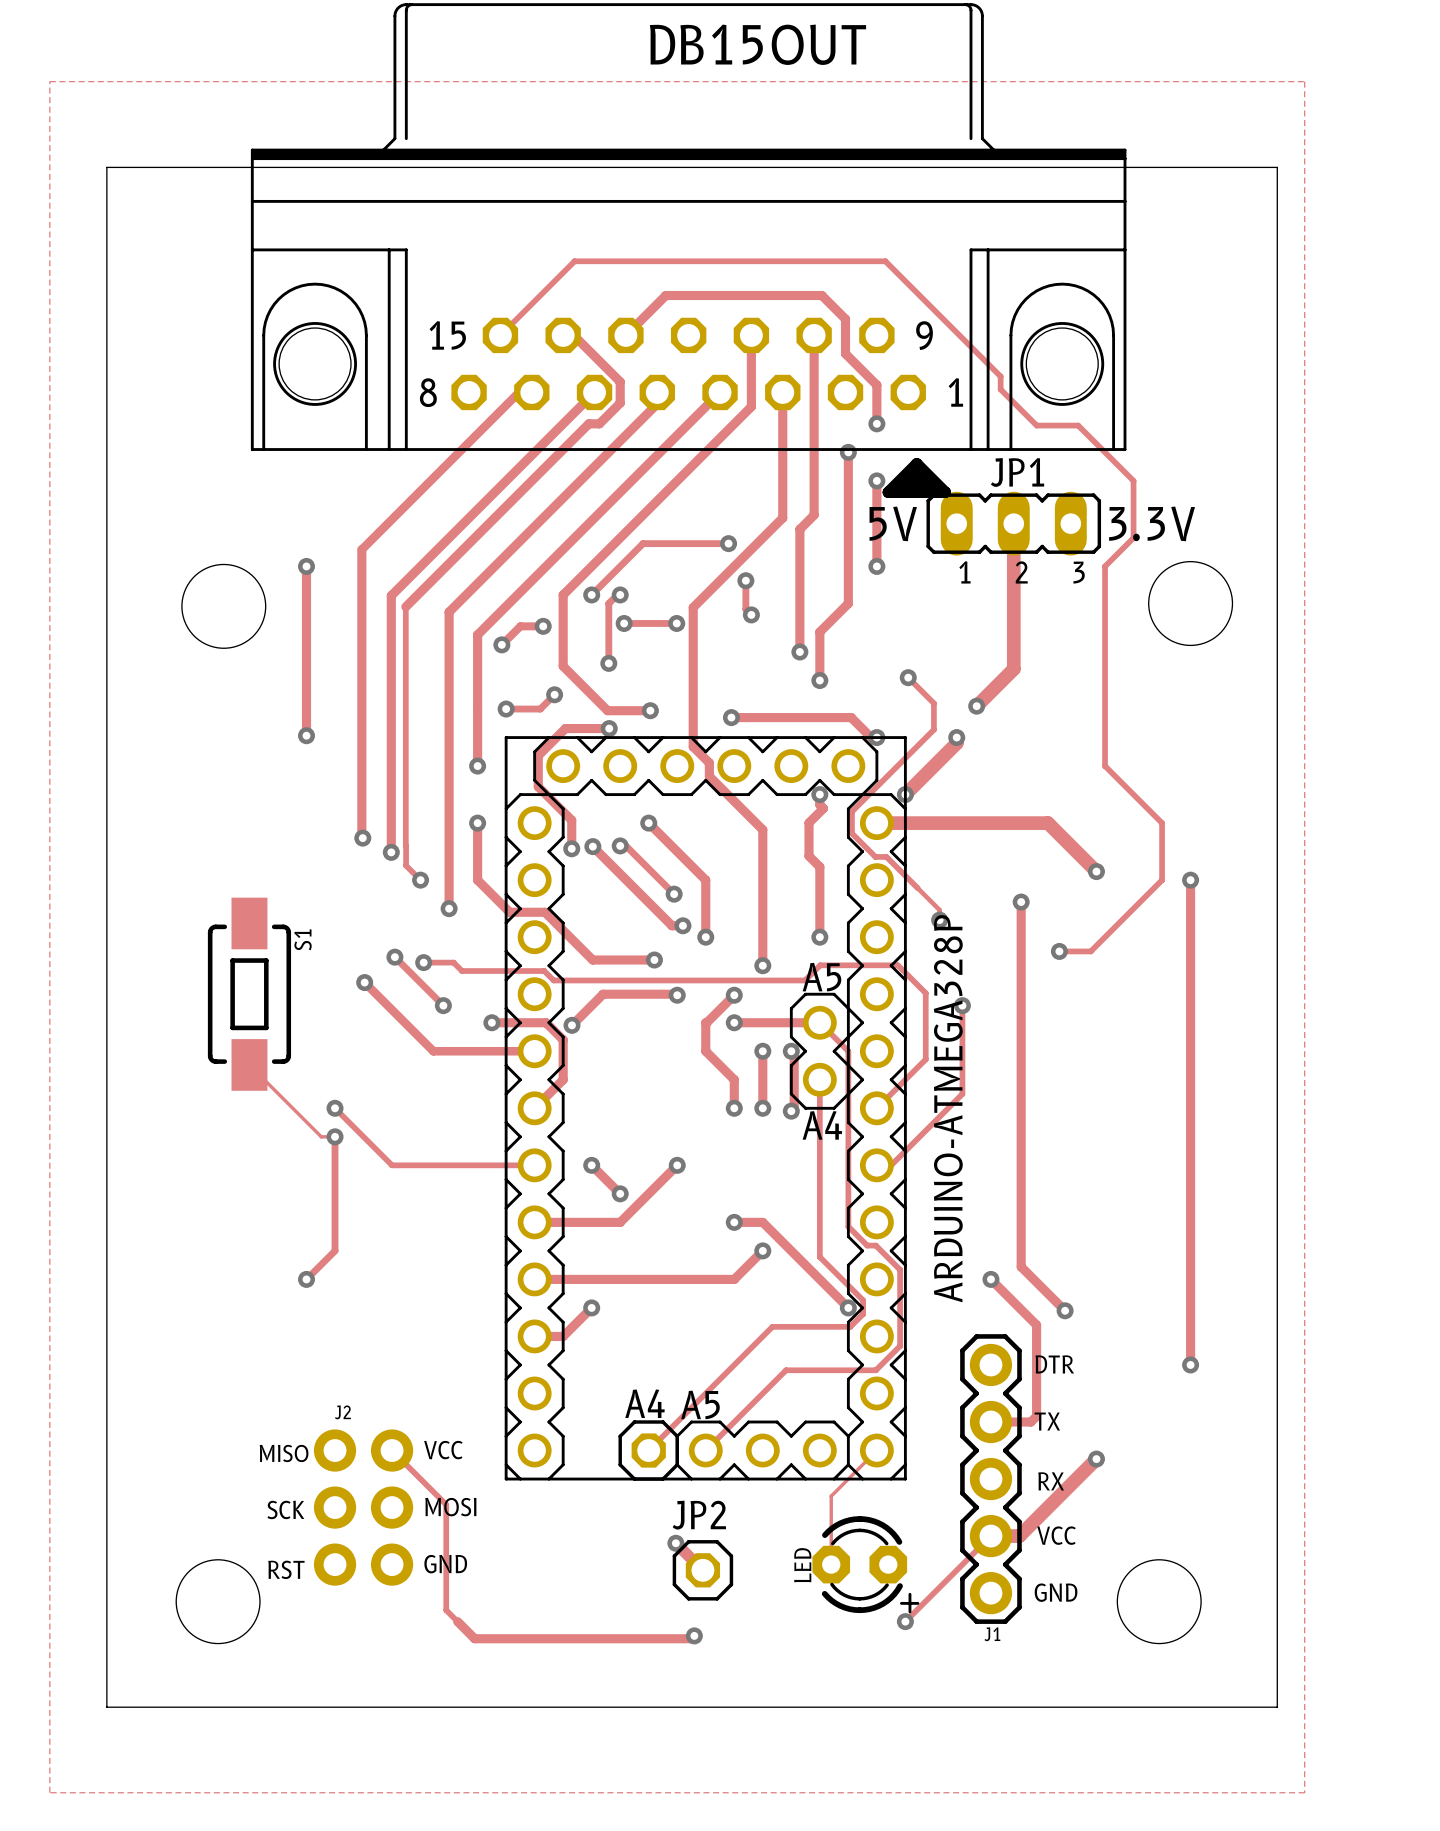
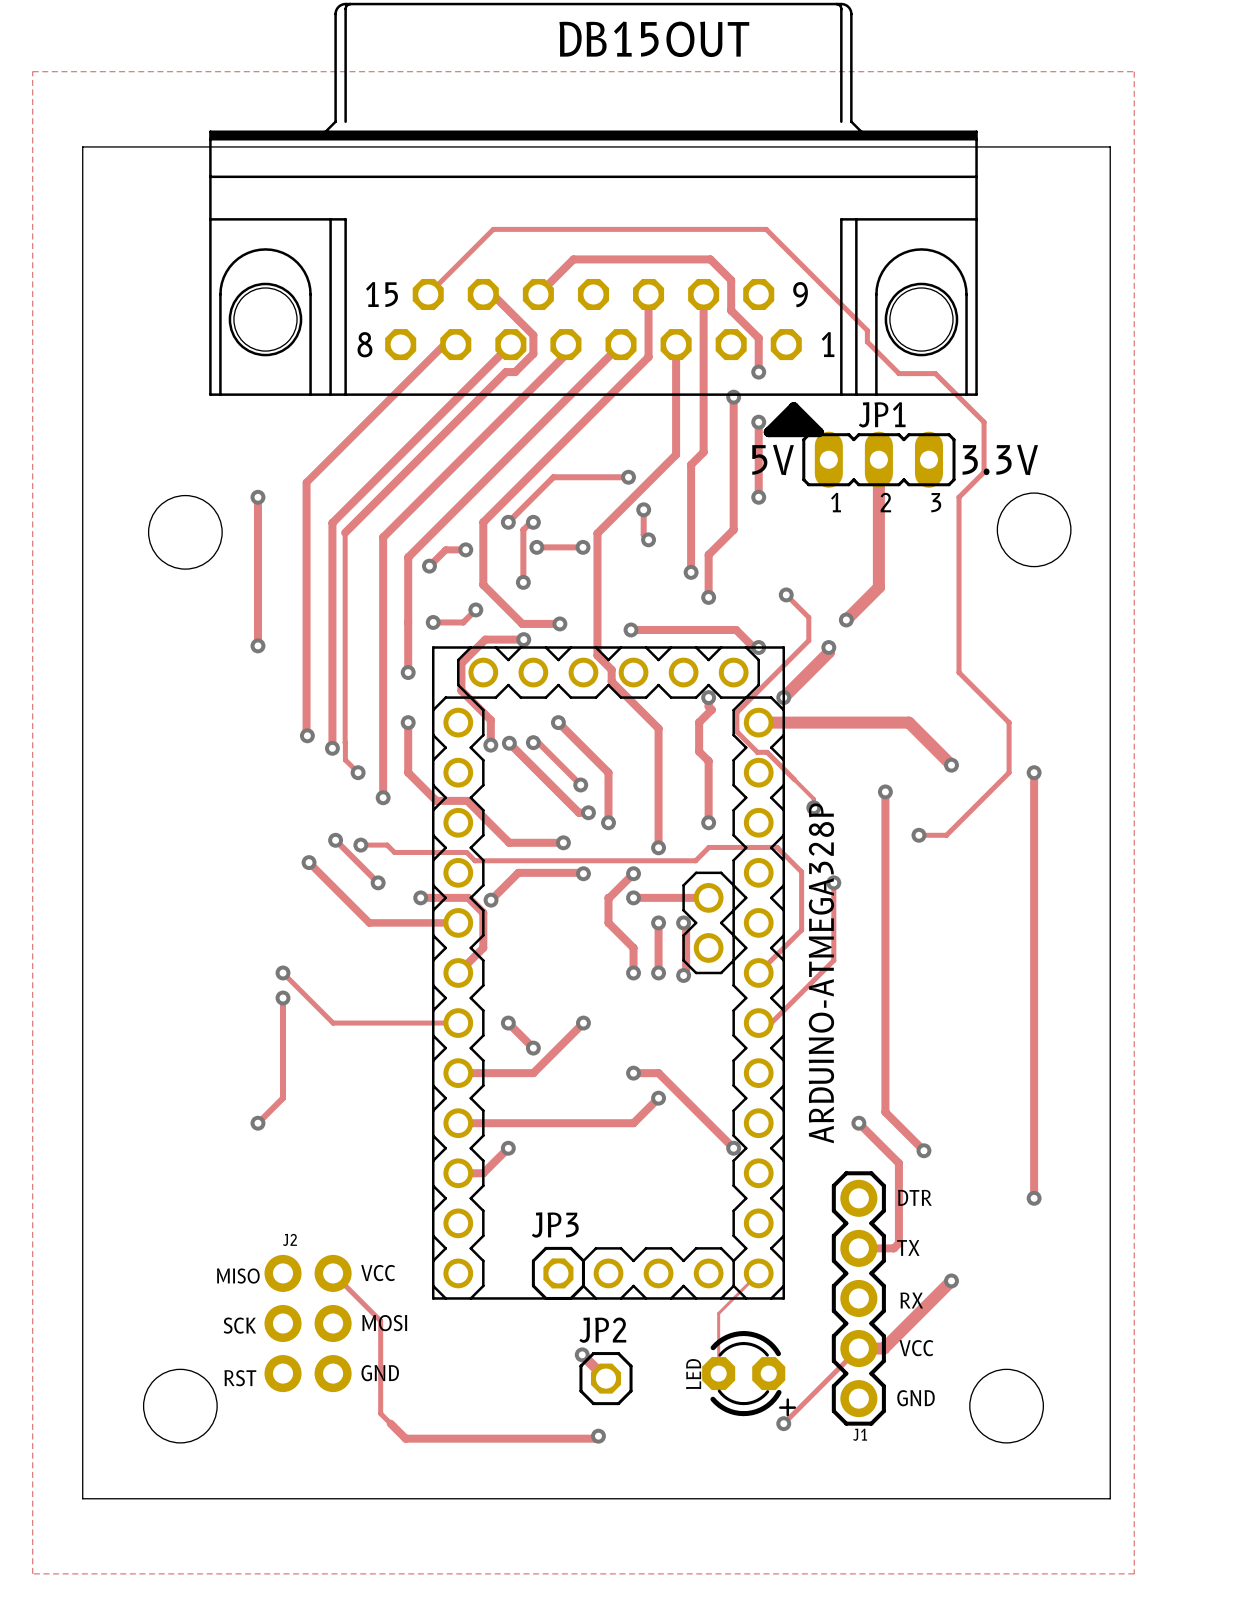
text: A5 (821, 977) -> none
S1: (249, 994) -> none
track: (819, 1022) (848, 1051) (848, 1226) (867, 1245) (875, 1245) (900, 1269) (900, 1346) (875, 1370) (786, 1370) (705, 1450) -> none
track: (249, 1064) (321, 1136) (335, 1136) -> none
track: (819, 1079) (819, 1257) (863, 1300) (863, 1314) (850, 1326) (772, 1326) (648, 1450) -> none
text: A4 (822, 1125) -> none
A4 name: A4 (644, 1403) -> JP3 (555, 1225)
text: A5 (700, 1404) -> none

